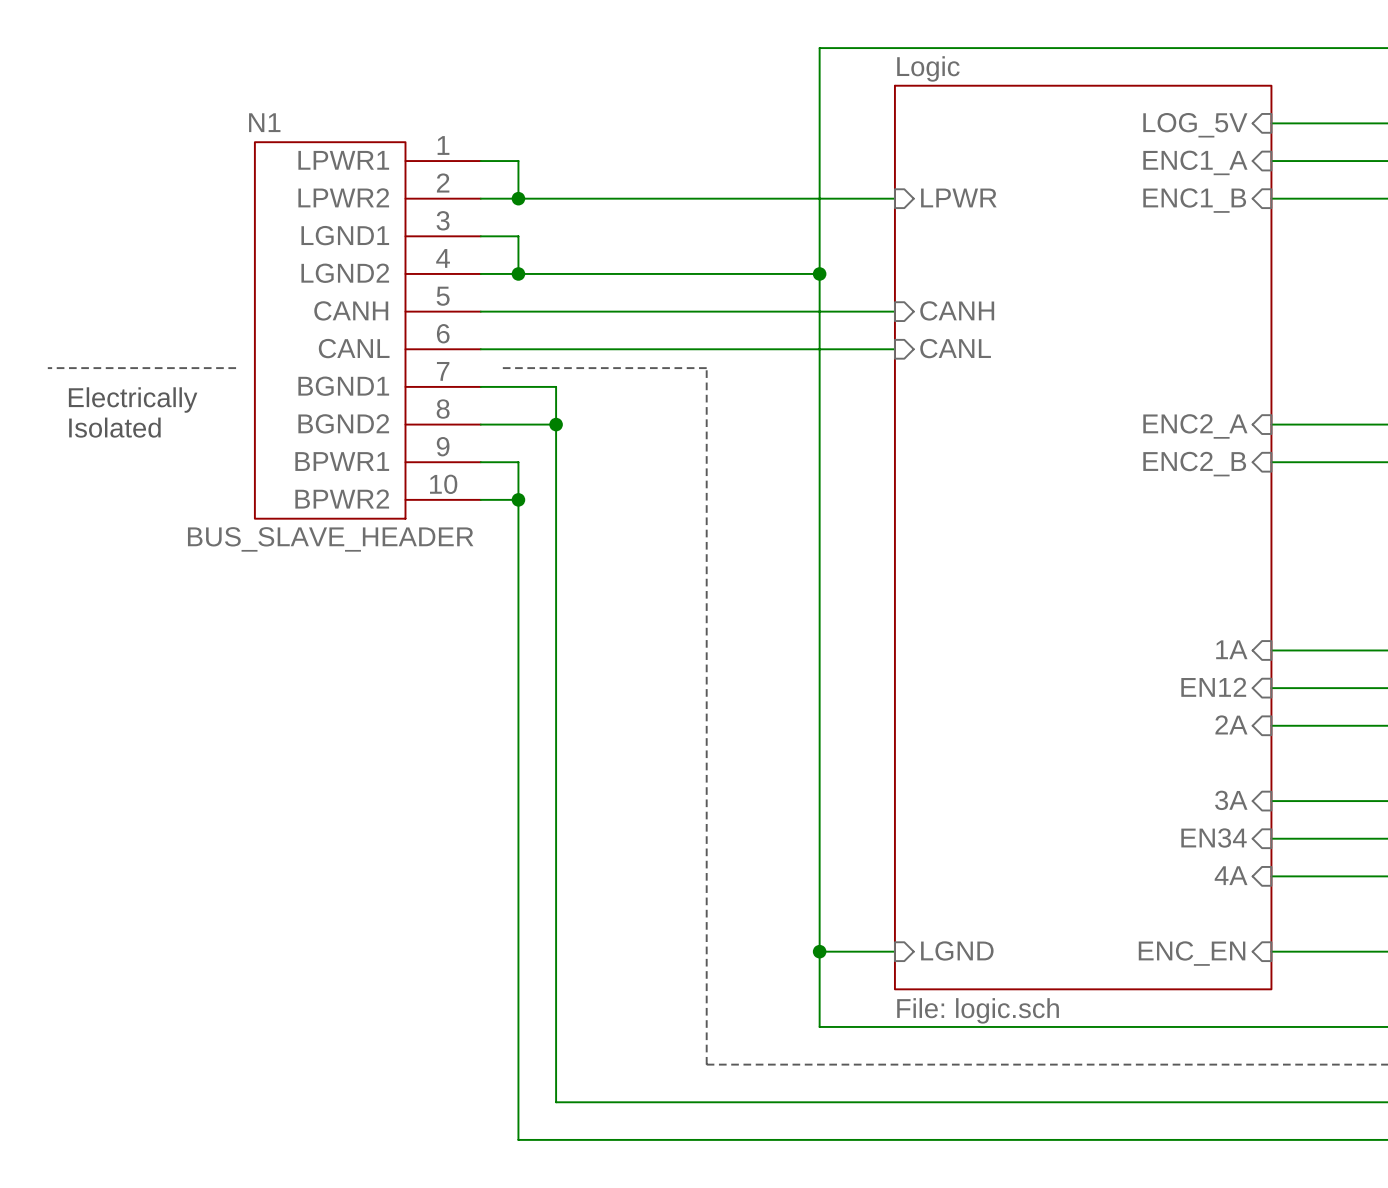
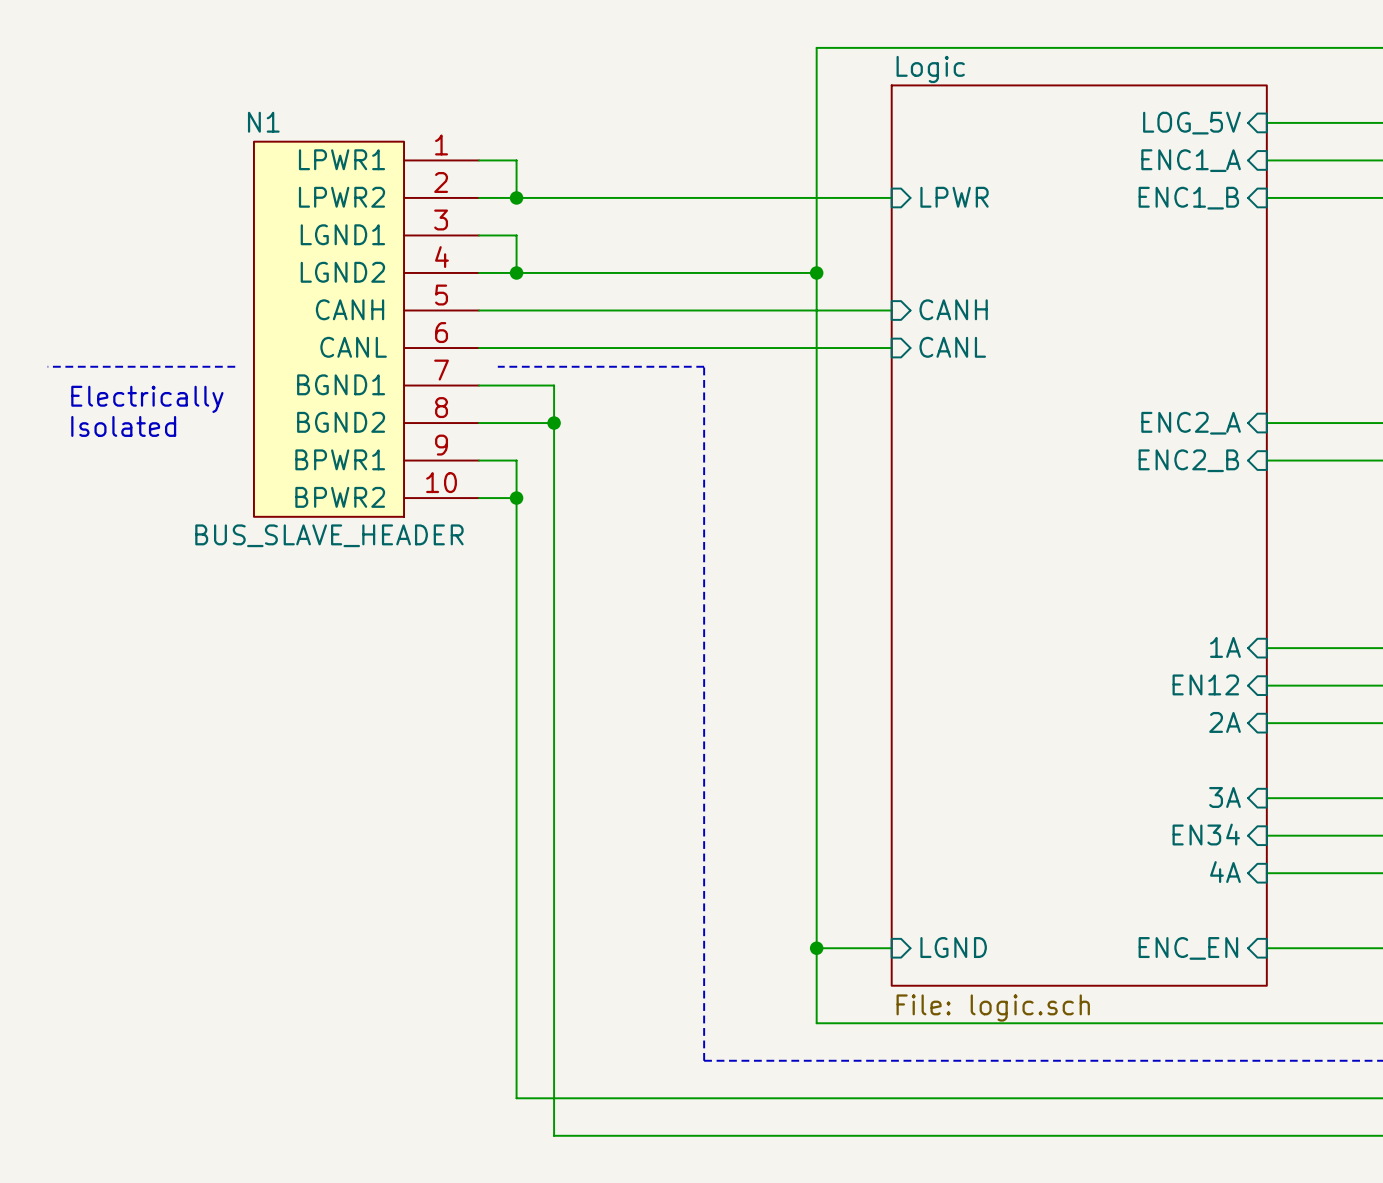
wire: (518, 1102) (518, 1139) (556, 1139) -> (516, 1098) (554, 1098) (554, 1135)

